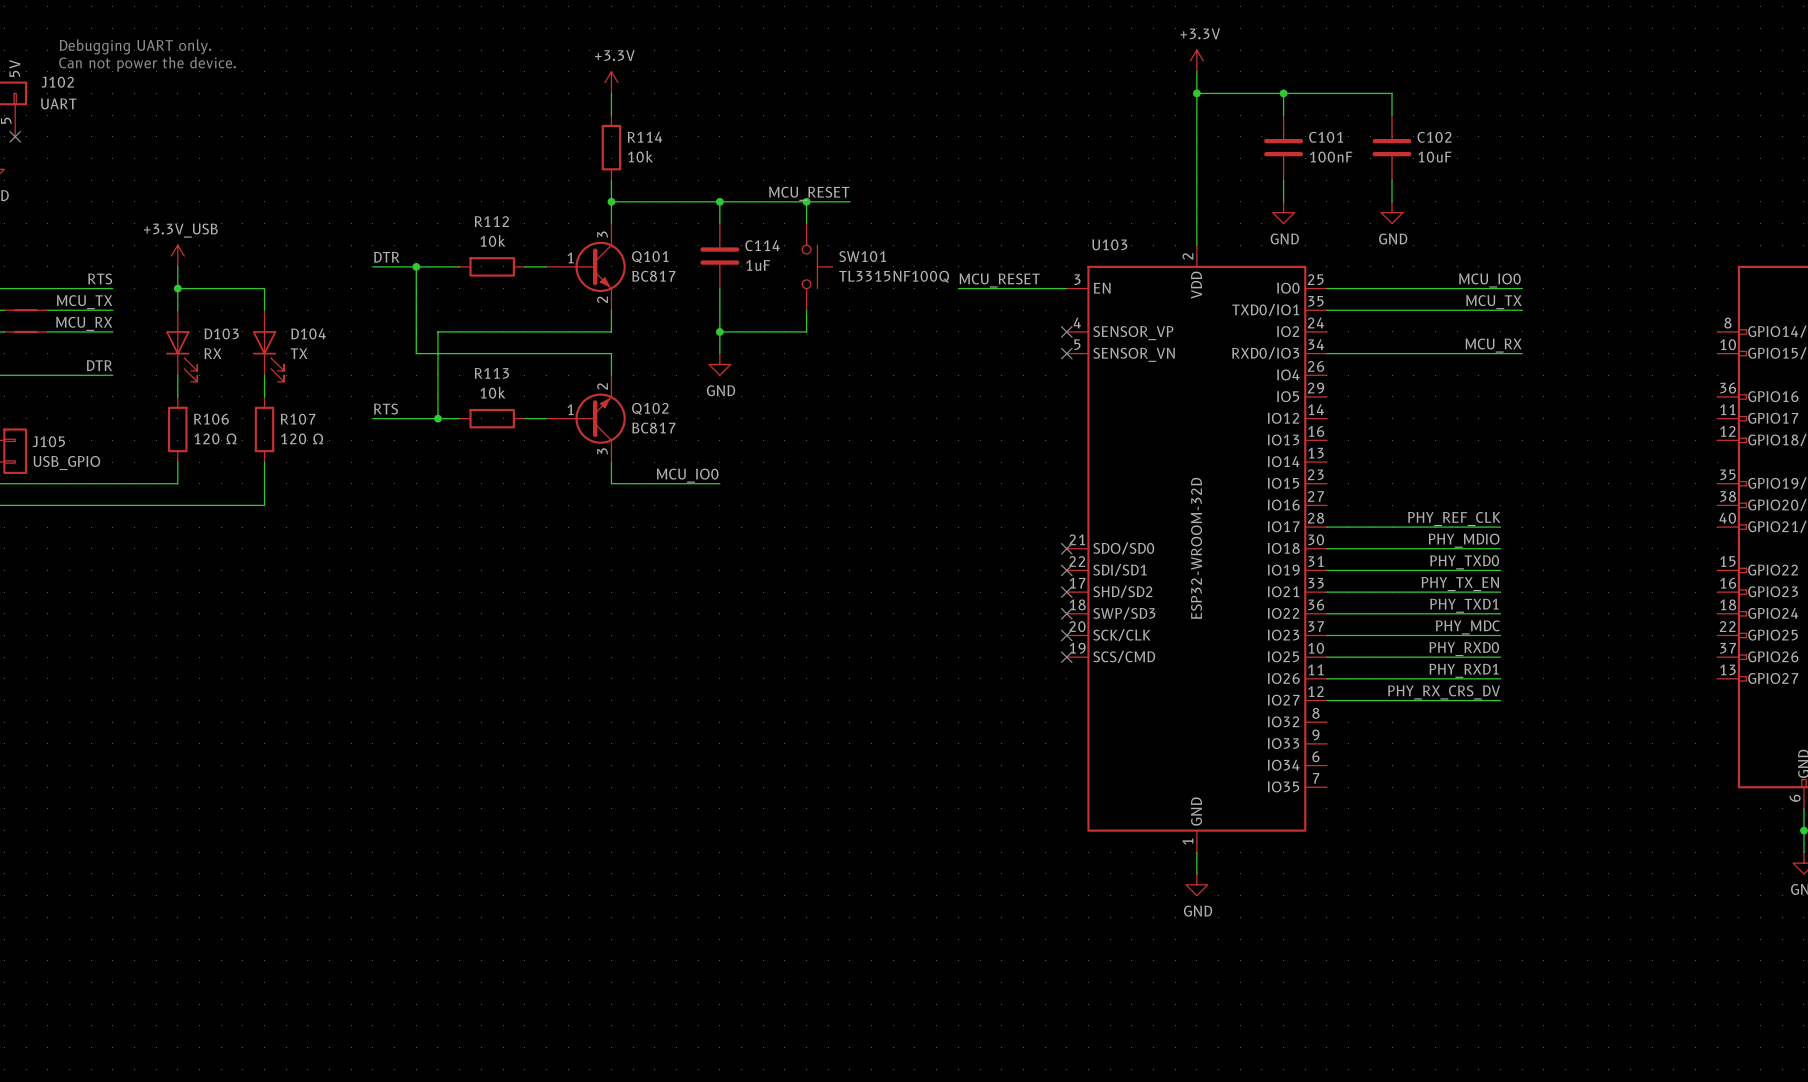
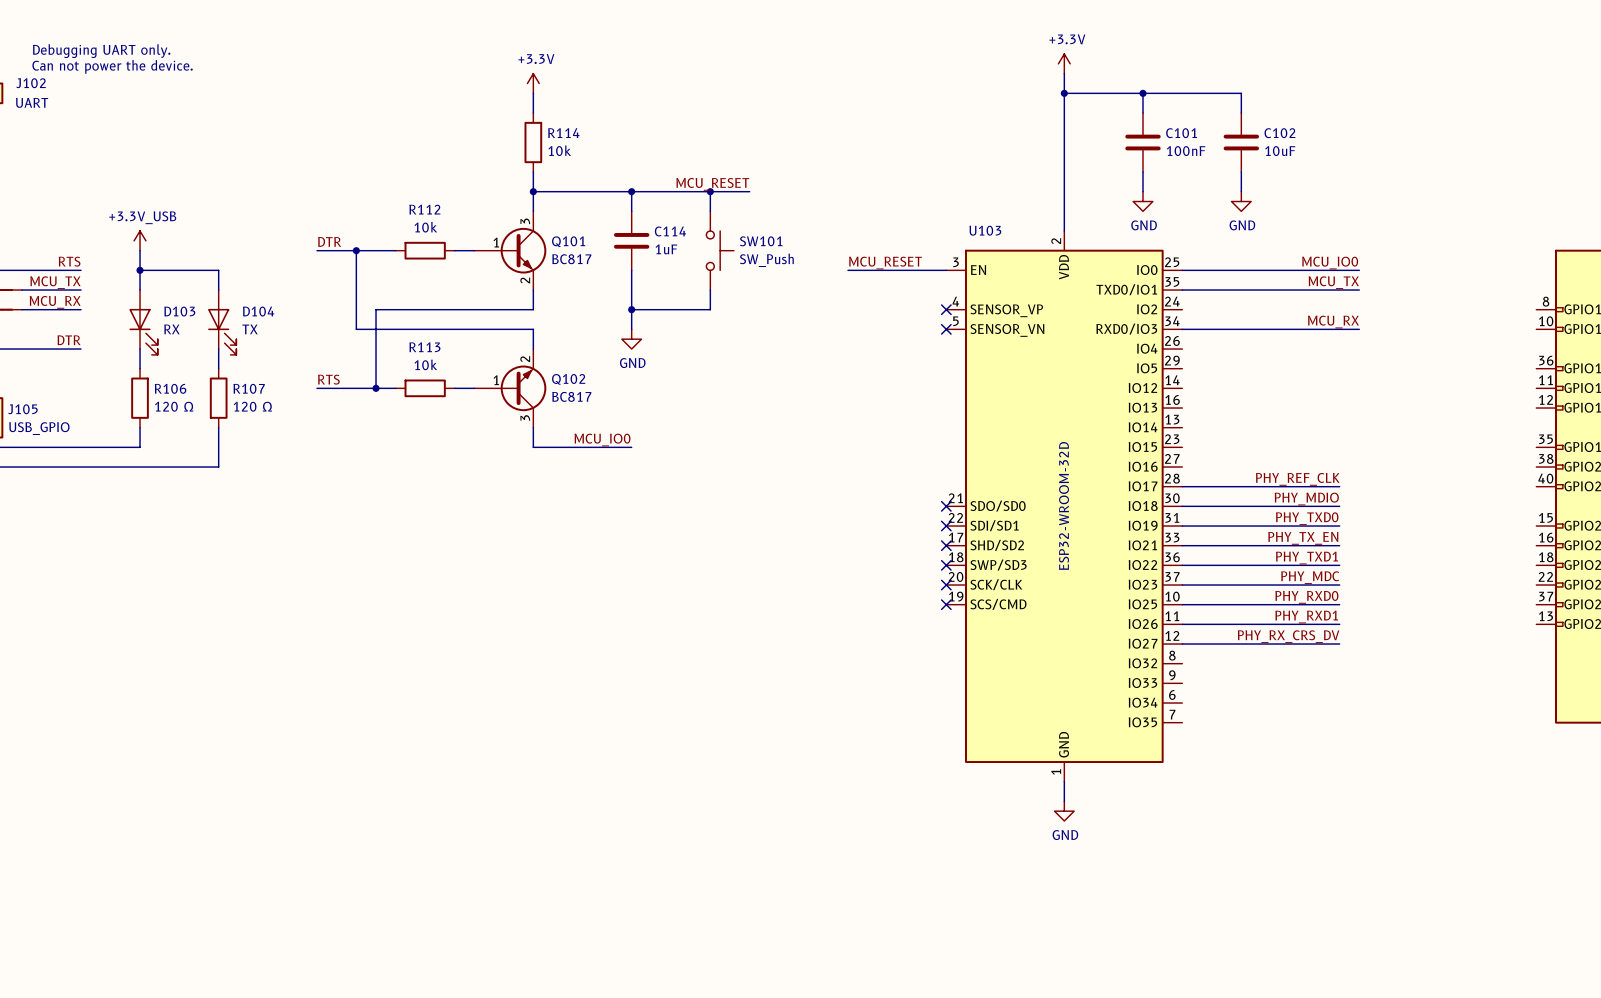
SW101 value: TL3315NF100Q (894, 276) -> SW_Push (766, 260)

